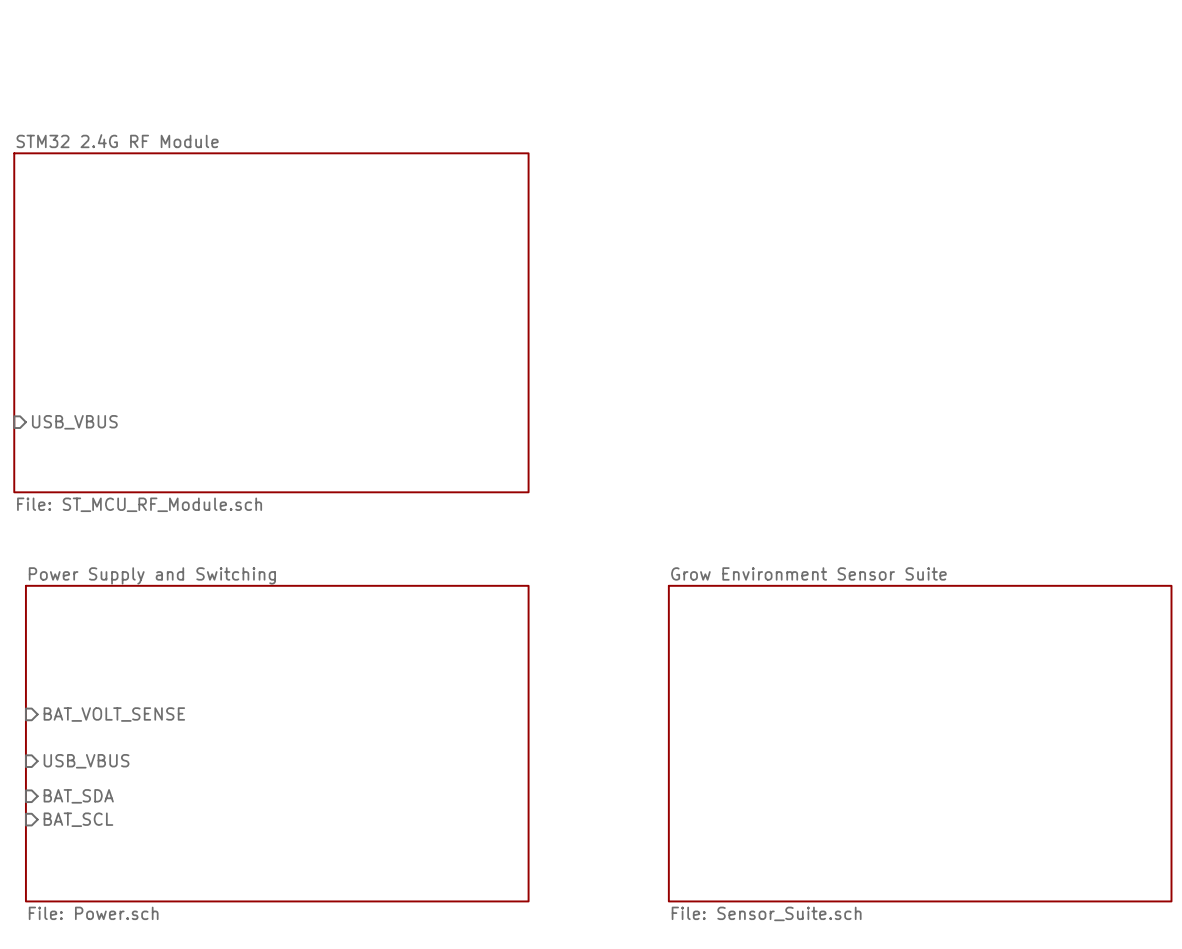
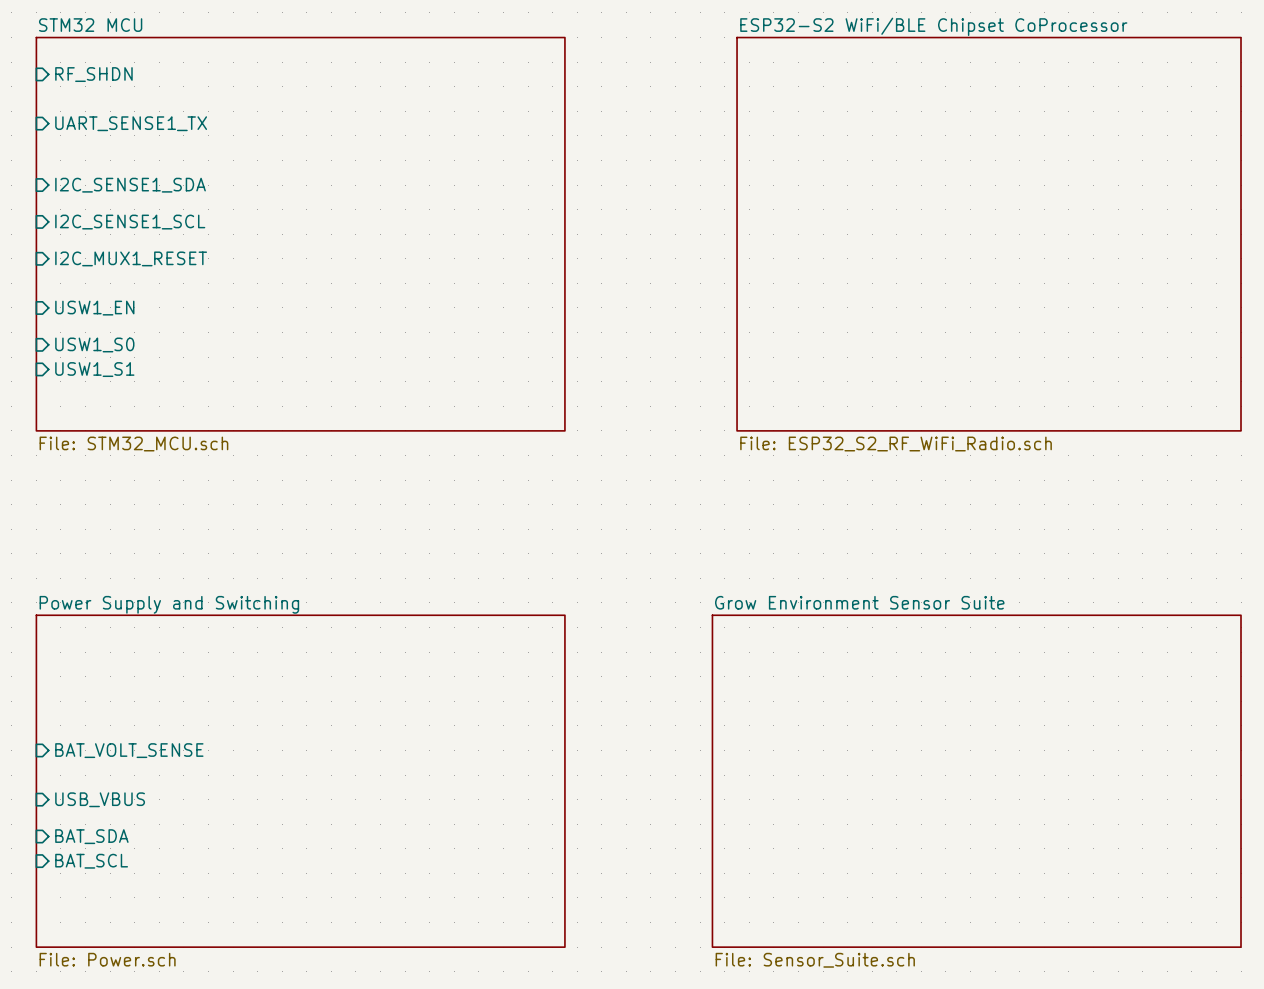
sheet pin: none -> RF_SHDN (93, 74)
sheet pin: none -> UART_SENSE1_TX (131, 123)
sheet pin: none -> I2C_SENSE1_SDA (130, 185)
sheet pin: none -> I2C_SENSE1_SCL (130, 222)
sheet STM32 MCU: none -> File: STM32_MCU.sch (300, 234)
sheet ESP32-S2 WiFi/BLE Chipset CoProcessor: none -> File: ESP32_S2_RF_WiFi_Radio.sch (989, 234)
sheet pin: none -> I2C_MUX1_RESET (131, 258)
sheet pin: none -> USW1_EN (94, 308)
sheet STM32 2.4G RF Module: File: ST_MCU_RF_Module.sch (271, 322) -> none
sheet pin: none -> USW1_S0 (94, 344)
sheet pin: none -> USW1_S1 (94, 369)
sheet pin: USB_VBUS (74, 422) -> none

